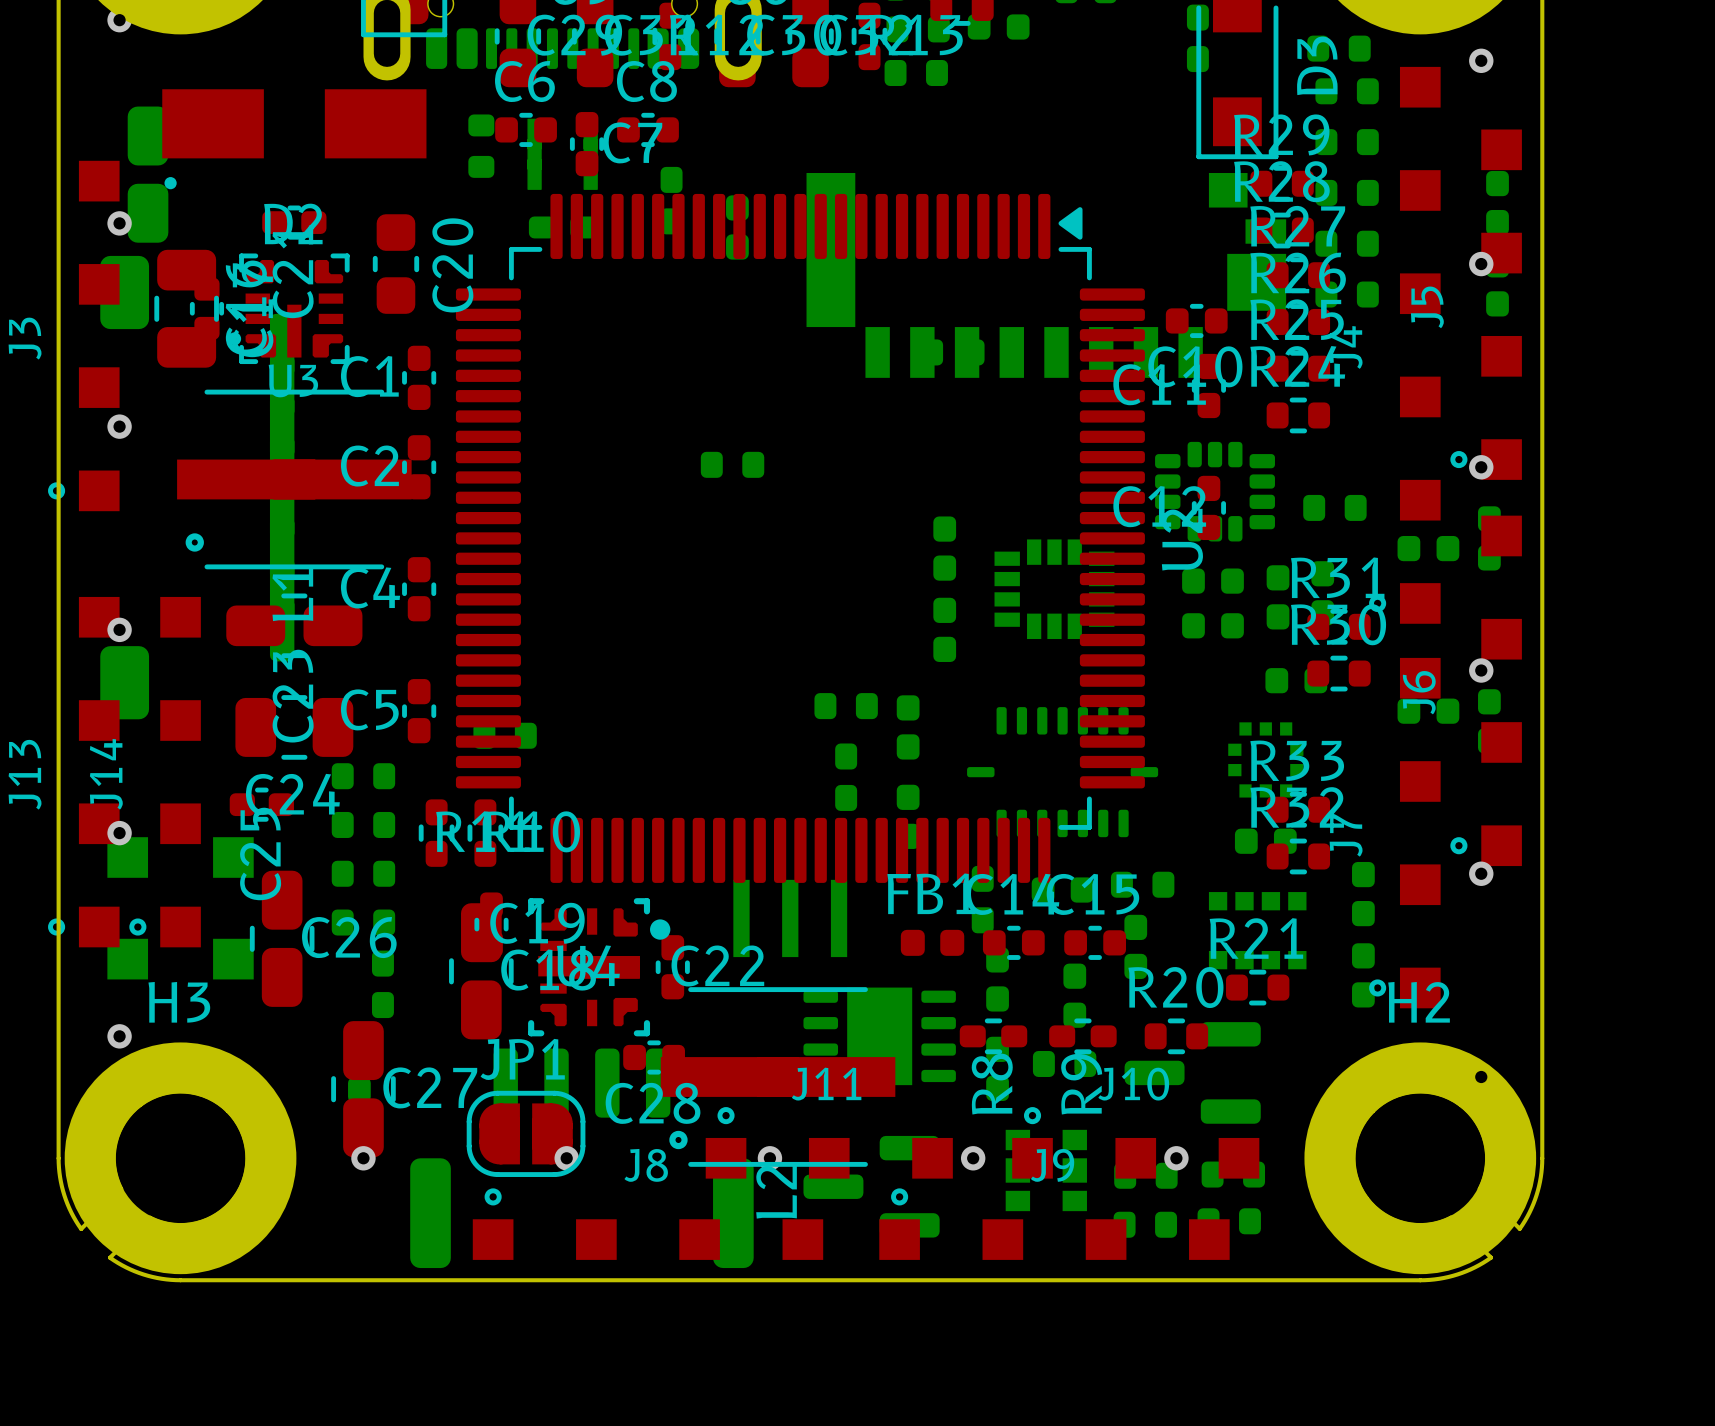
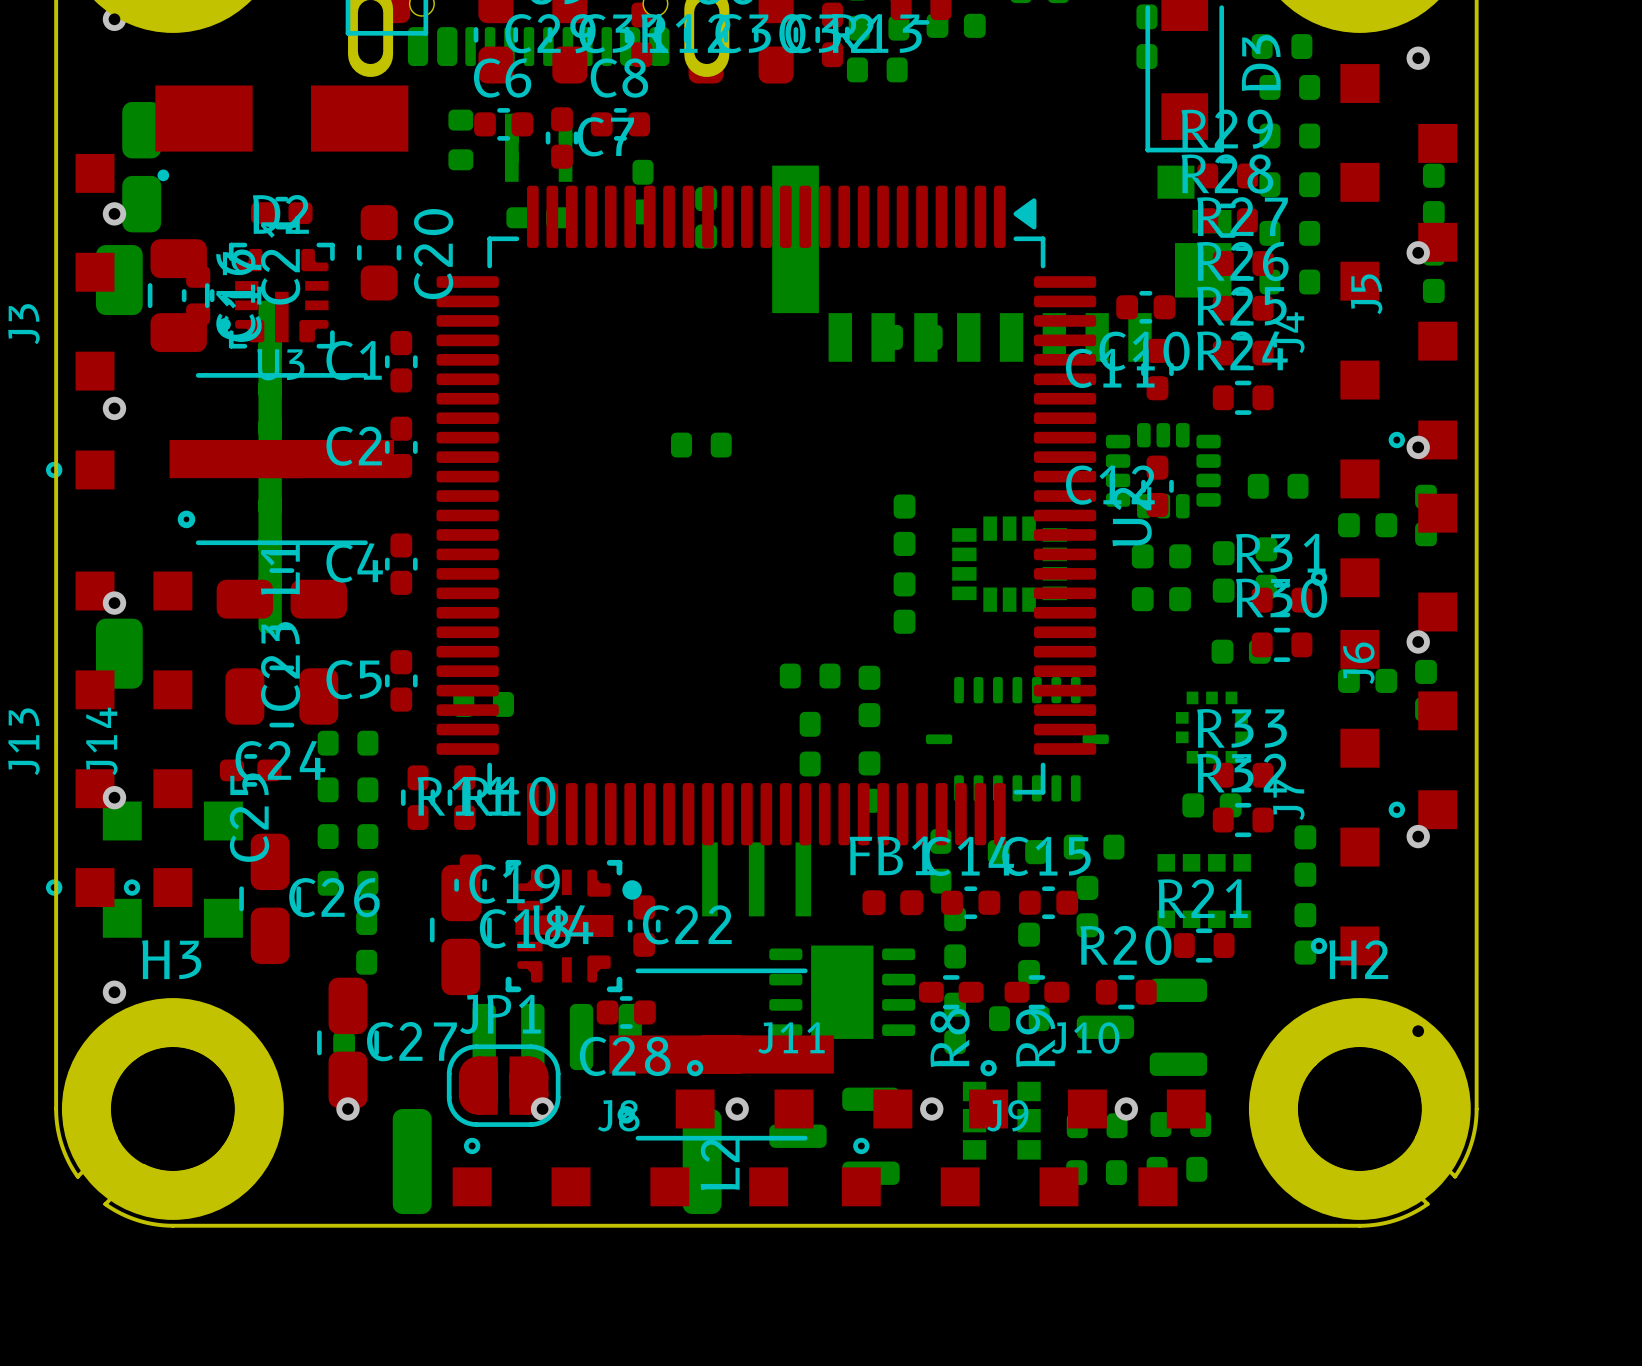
L2 position: (778, 1076) -> (721, 1054)

